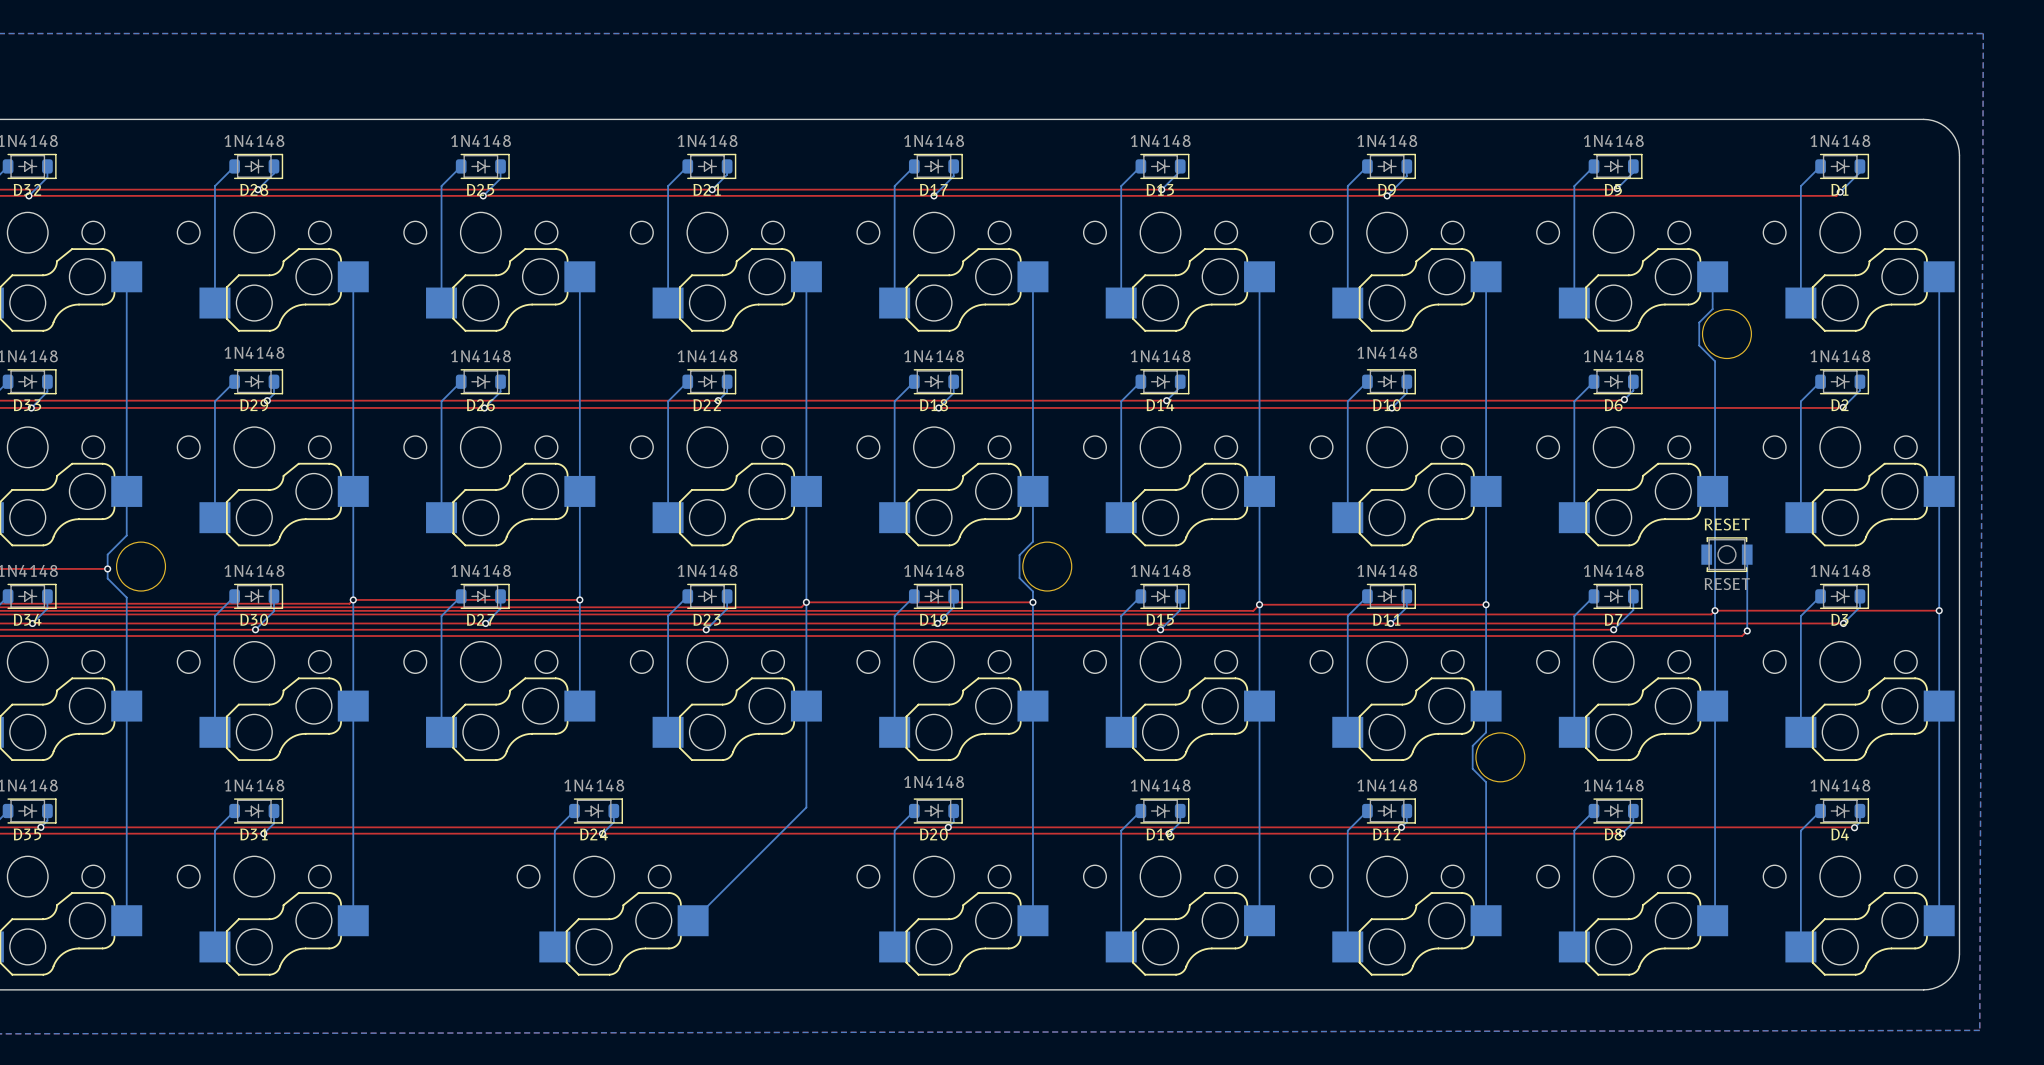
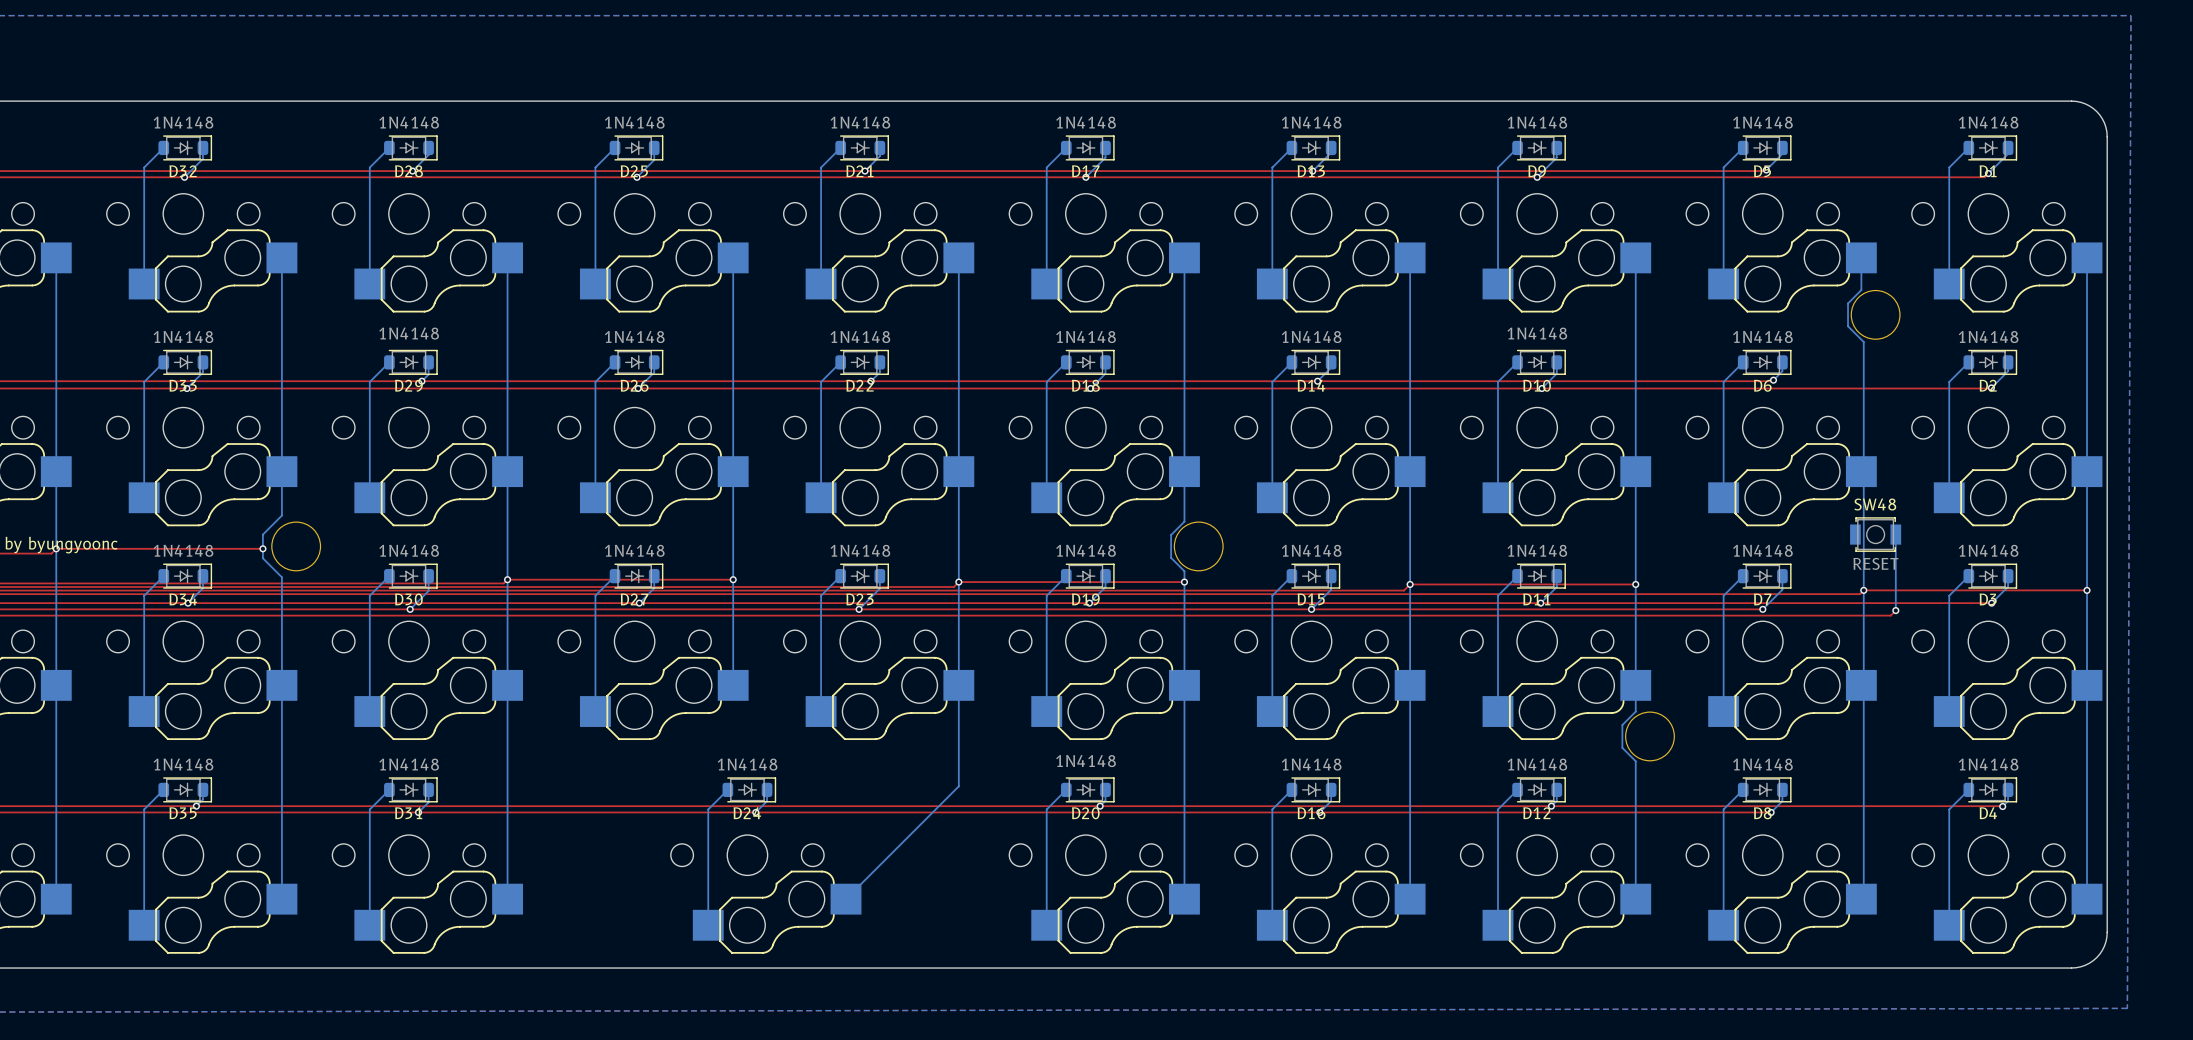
RESET name: RESET (1727, 524) -> SW48 (1875, 504)

